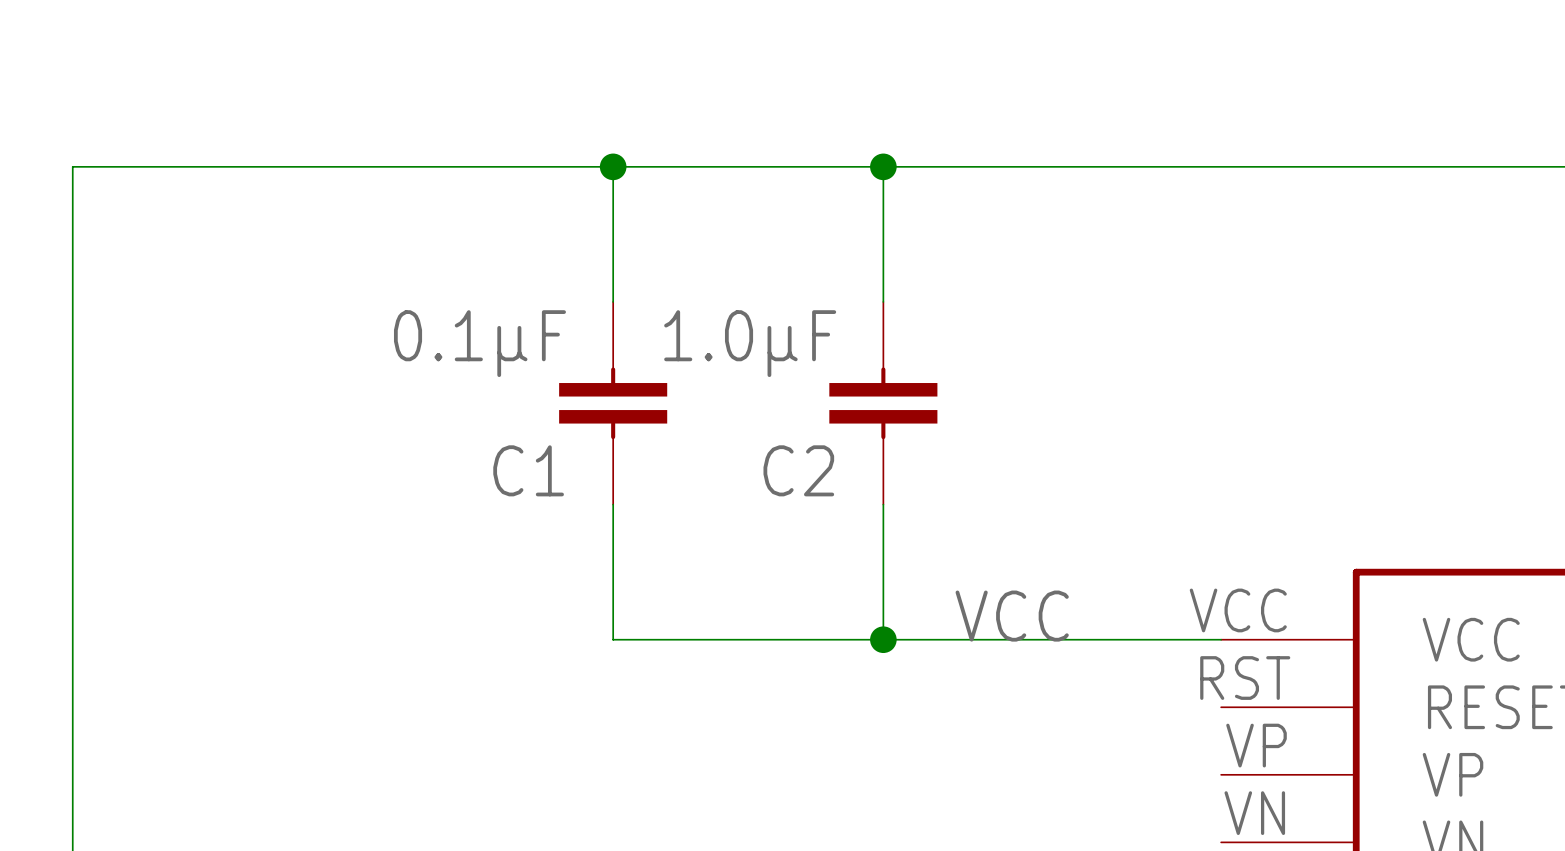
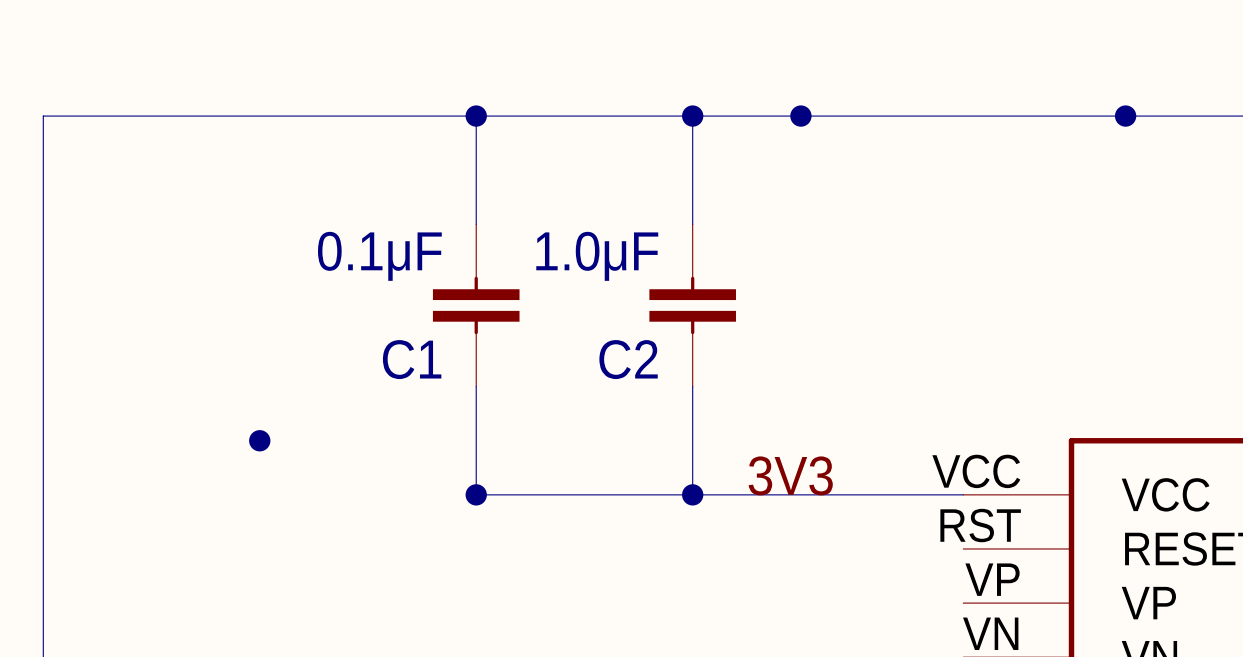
junction: none -> (800, 116)
junction: none -> (1125, 116)
junction: none -> (259, 440)
label: VCC (1012, 616) -> 3V3 (790, 475)
junction: none -> (476, 494)

